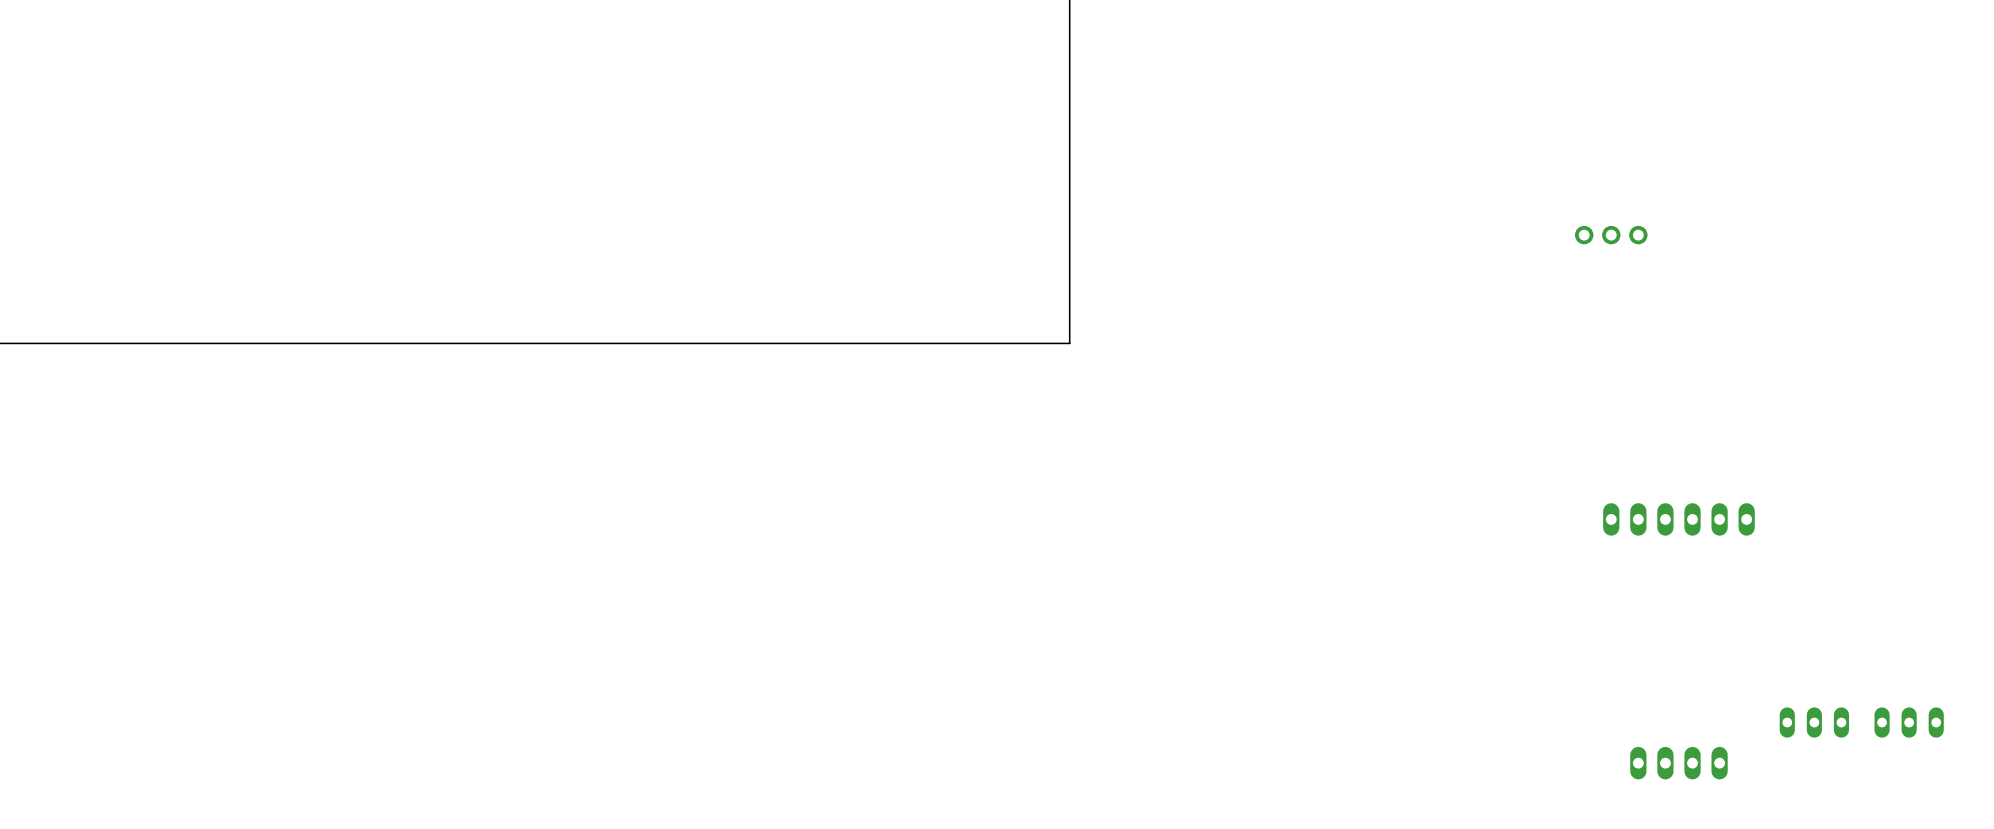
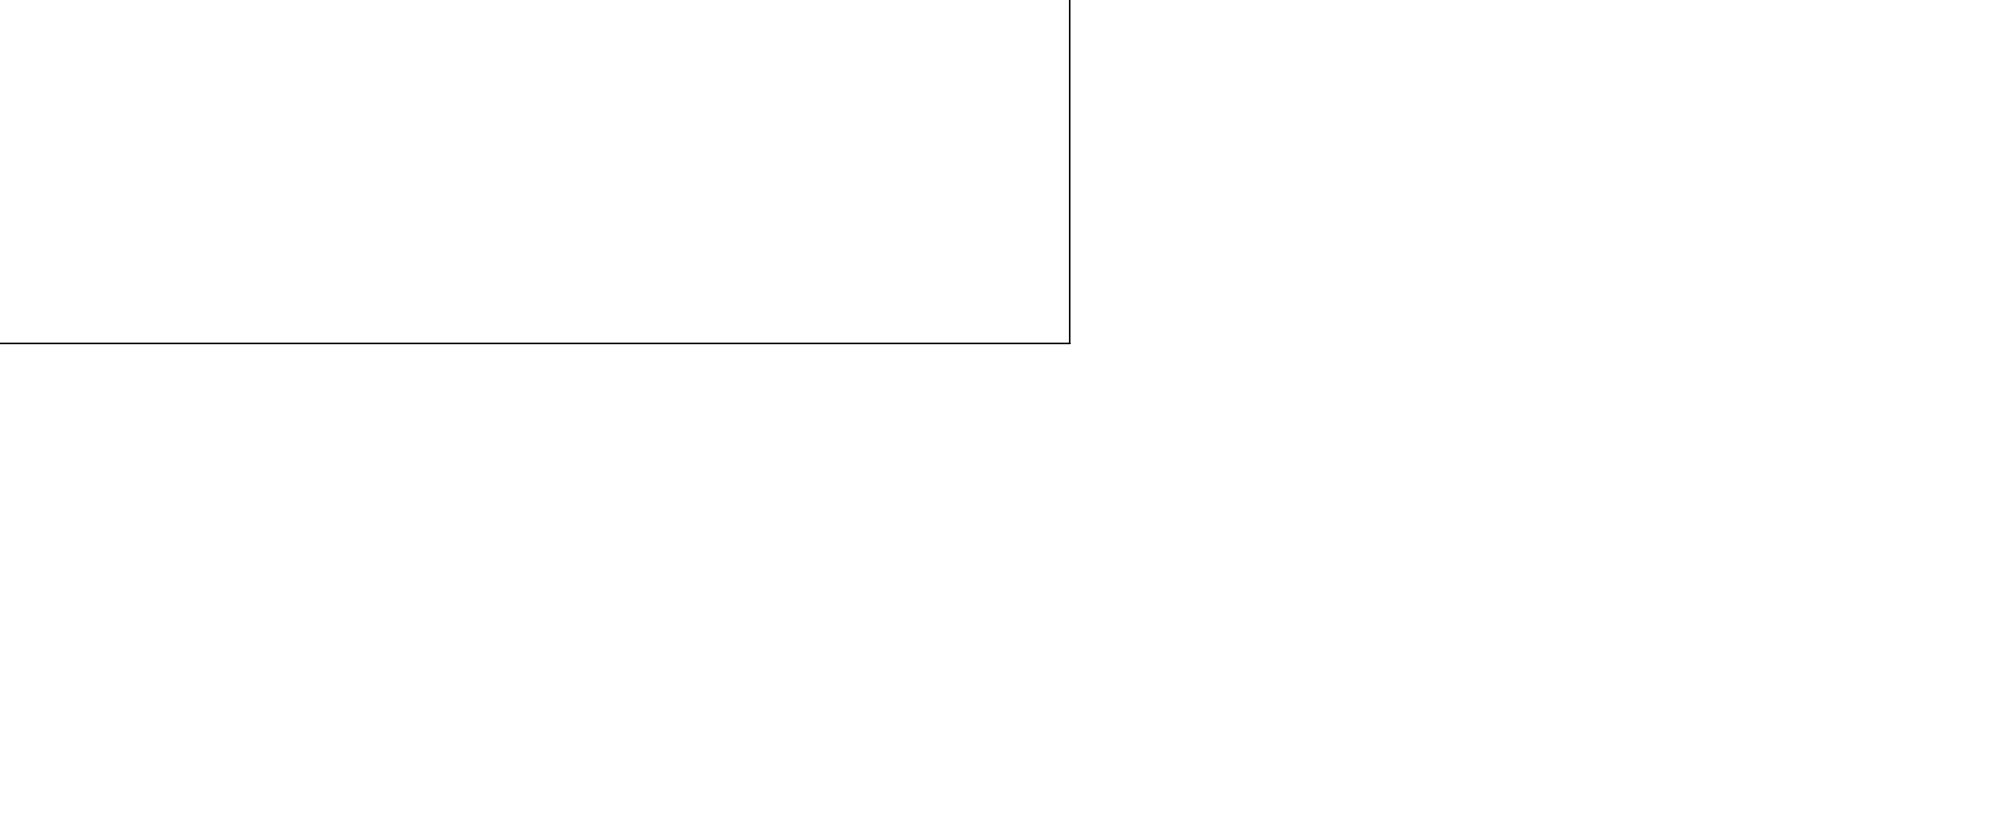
part: (1611, 235) -> none
part: (1678, 519) -> none
part: (1814, 722) -> none
part: (1909, 722) -> none
part: (1678, 763) -> none

